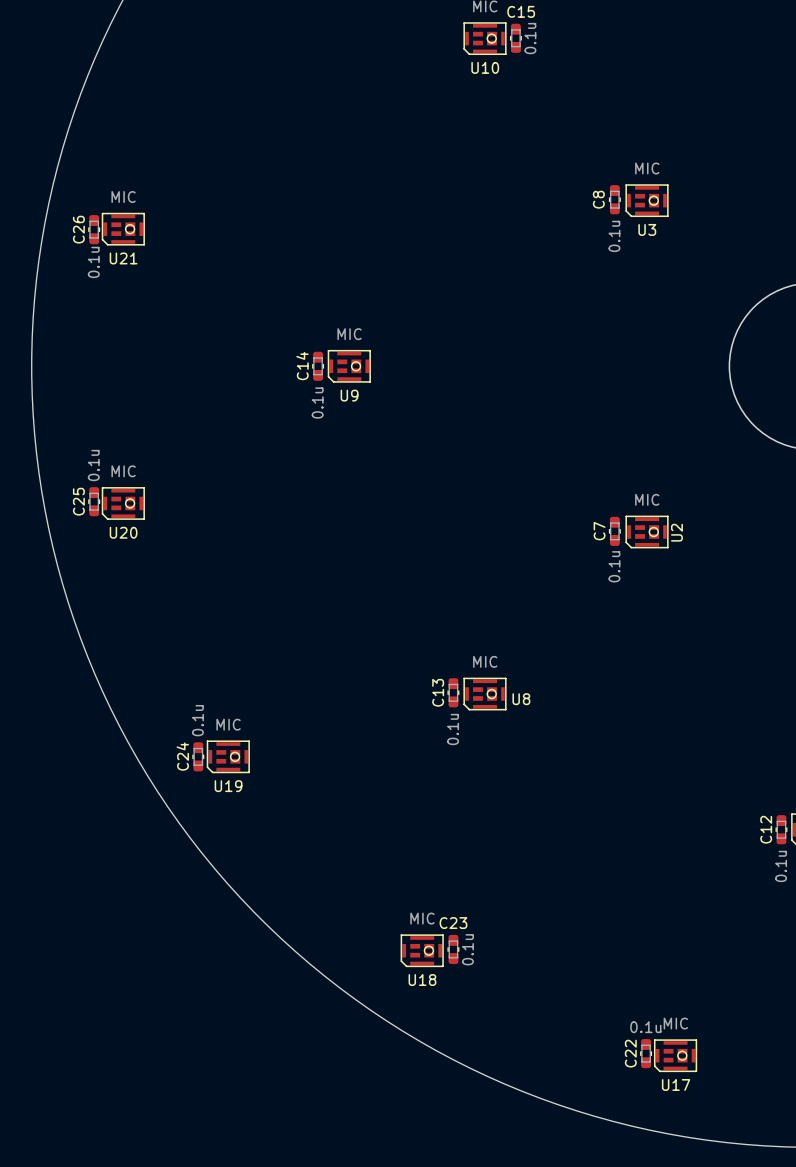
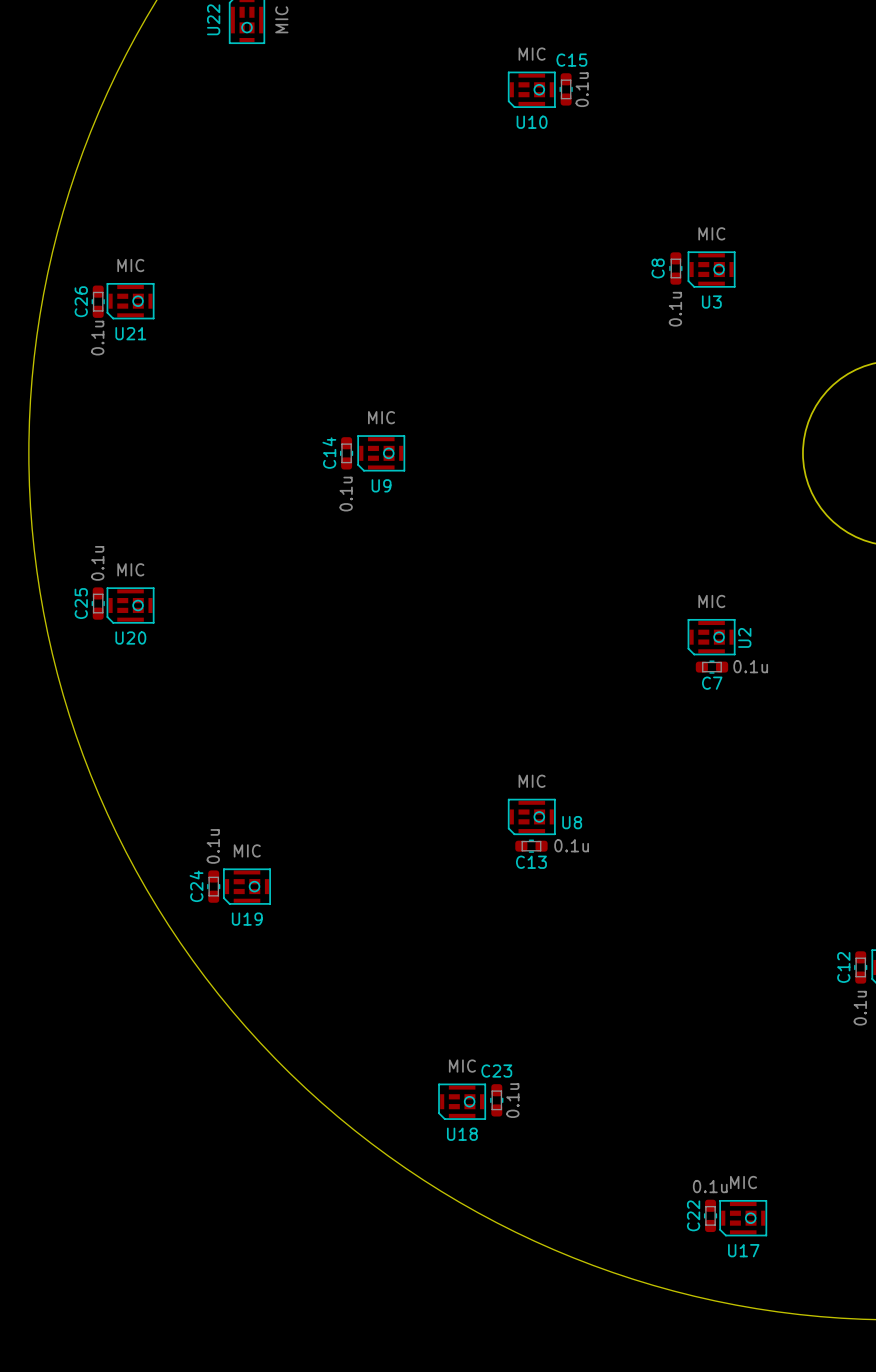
C7 name position: C7 (599, 531) -> C7 (712, 683)
C7 rotation: 0° (614, 531) -> 90° clockwise (711, 667)
C7 position: (614, 531) -> (711, 667)
C7 value position: 0.1u (614, 566) -> 0.1u (750, 666)
C13 name position: C13 (438, 692) -> C13 (531, 862)
C13 rotation: 0° (453, 692) -> 90° clockwise (531, 846)
C13 position: (453, 692) -> (531, 846)
C13 value position: 0.1u (453, 729) -> 0.1u (571, 845)

